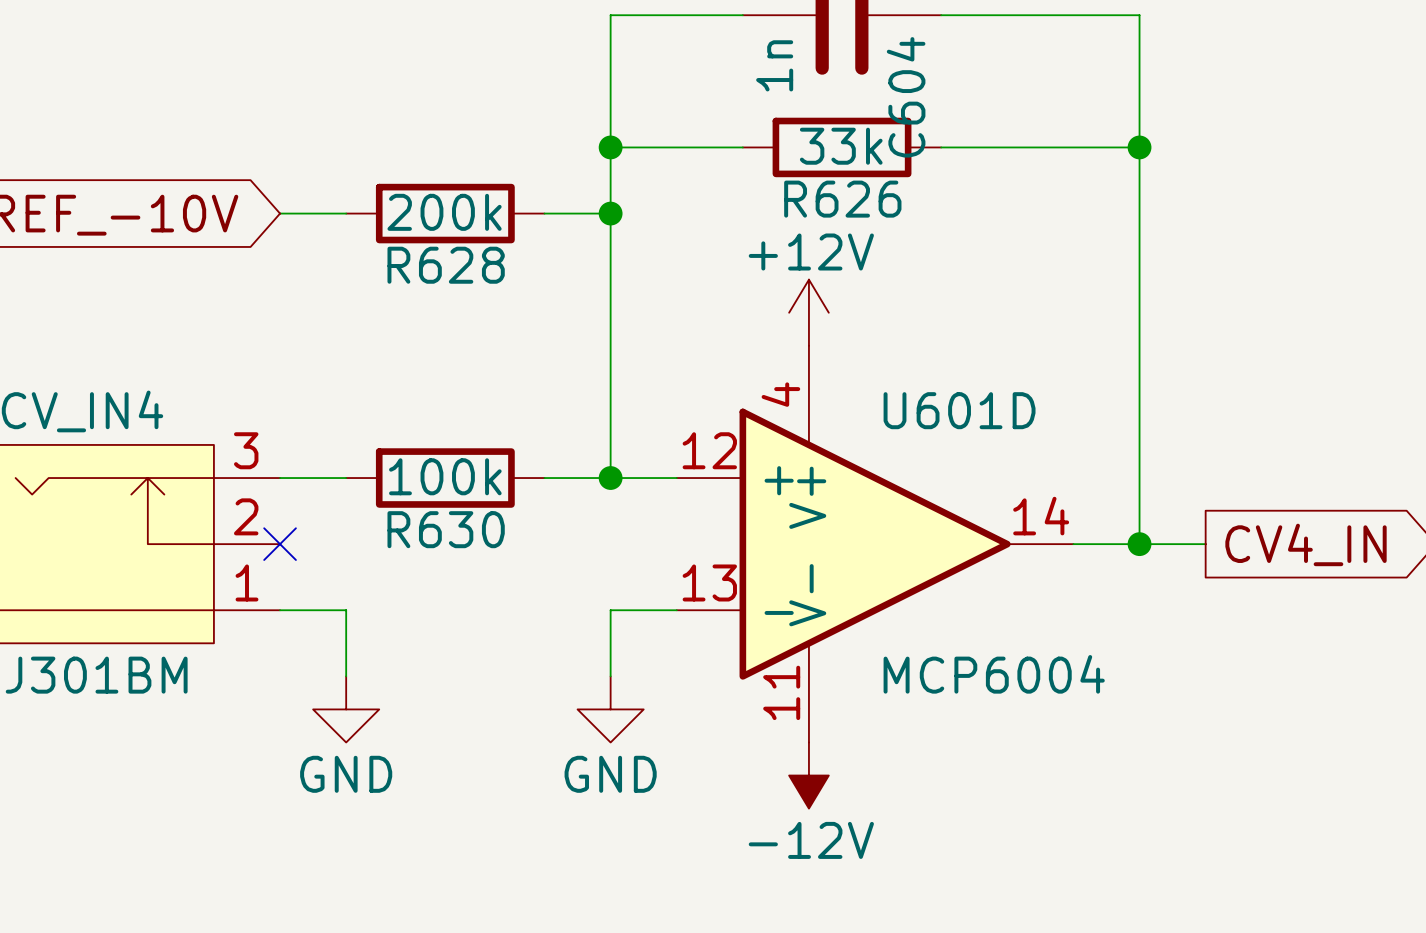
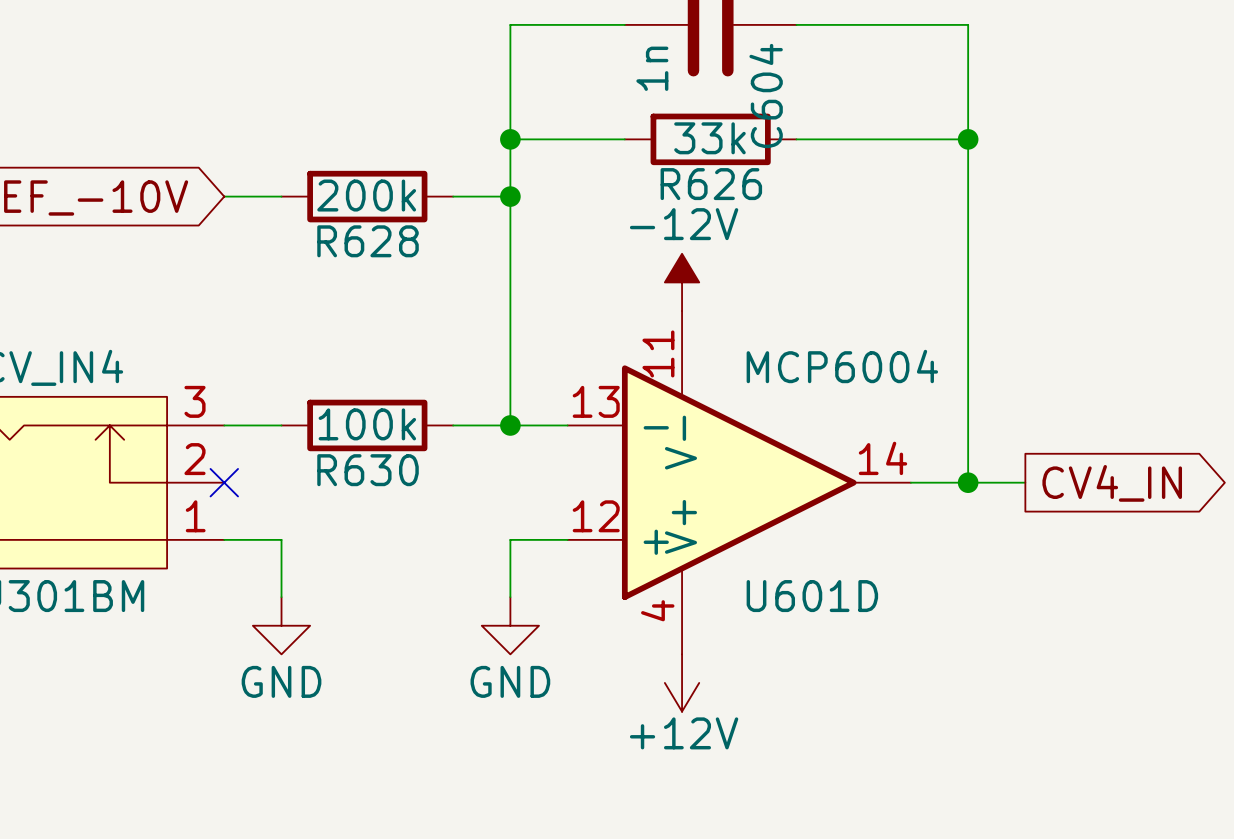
power symbol: +12V (808, 312) -> -12V (682, 282)
U601D flip: as is (875, 544) -> up-down (739, 482)
power symbol: -12V (808, 775) -> +12V (682, 682)

